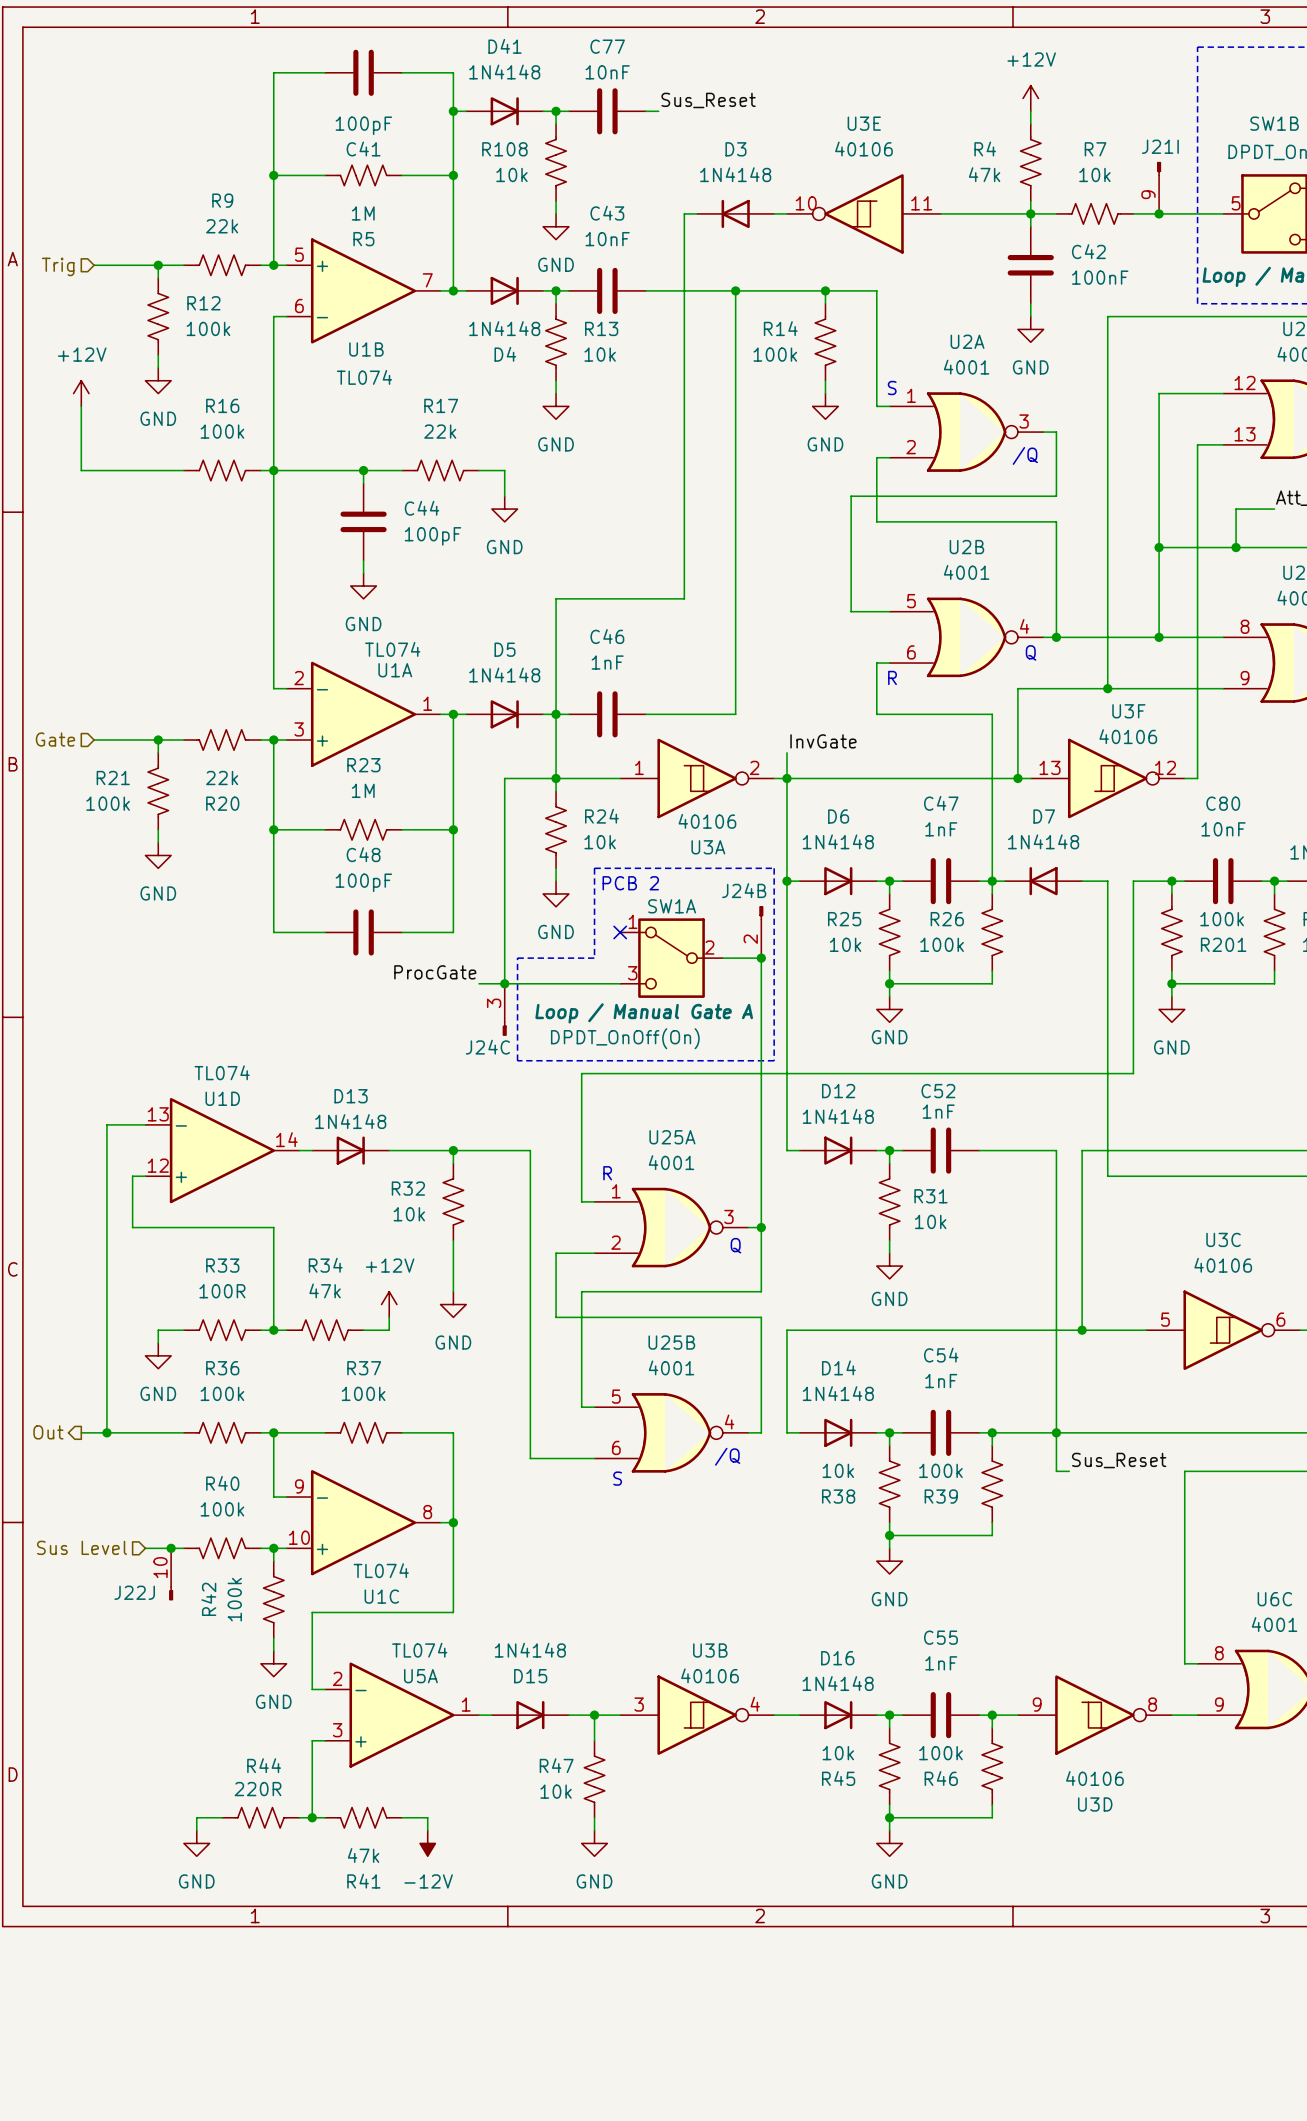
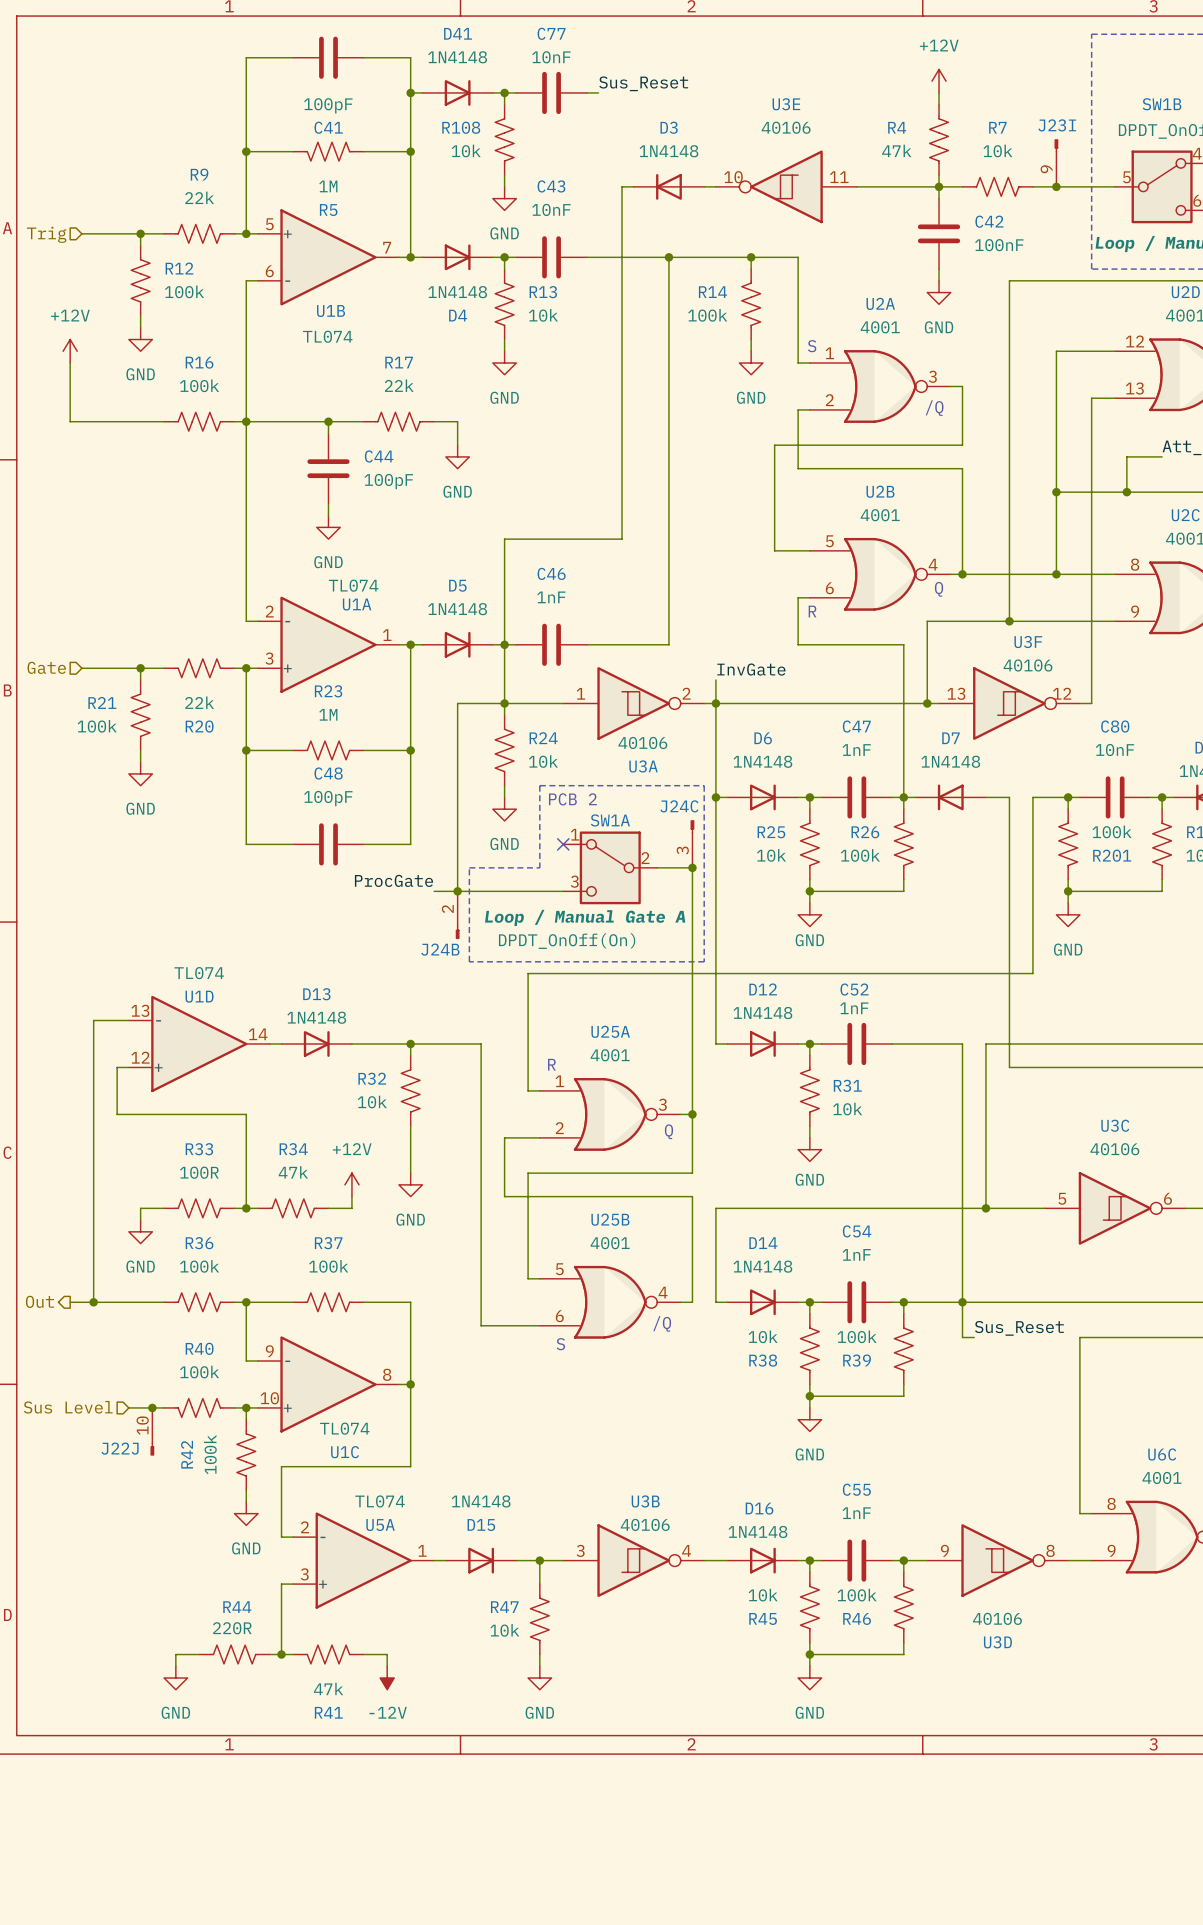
J21I name: J21I (1160, 146) -> J23I (1057, 125)
J24B name position: J24B (744, 890) -> J24B (440, 949)
J24B rotation: 0° (761, 913) -> 180° (457, 932)
J24B position: (761, 932) -> (457, 915)
J24C position: (504, 1009) -> (692, 844)
J24C rotation: 0° (504, 1028) -> 180° (692, 826)
J24C name position: J24C (487, 1047) -> J24C (679, 806)

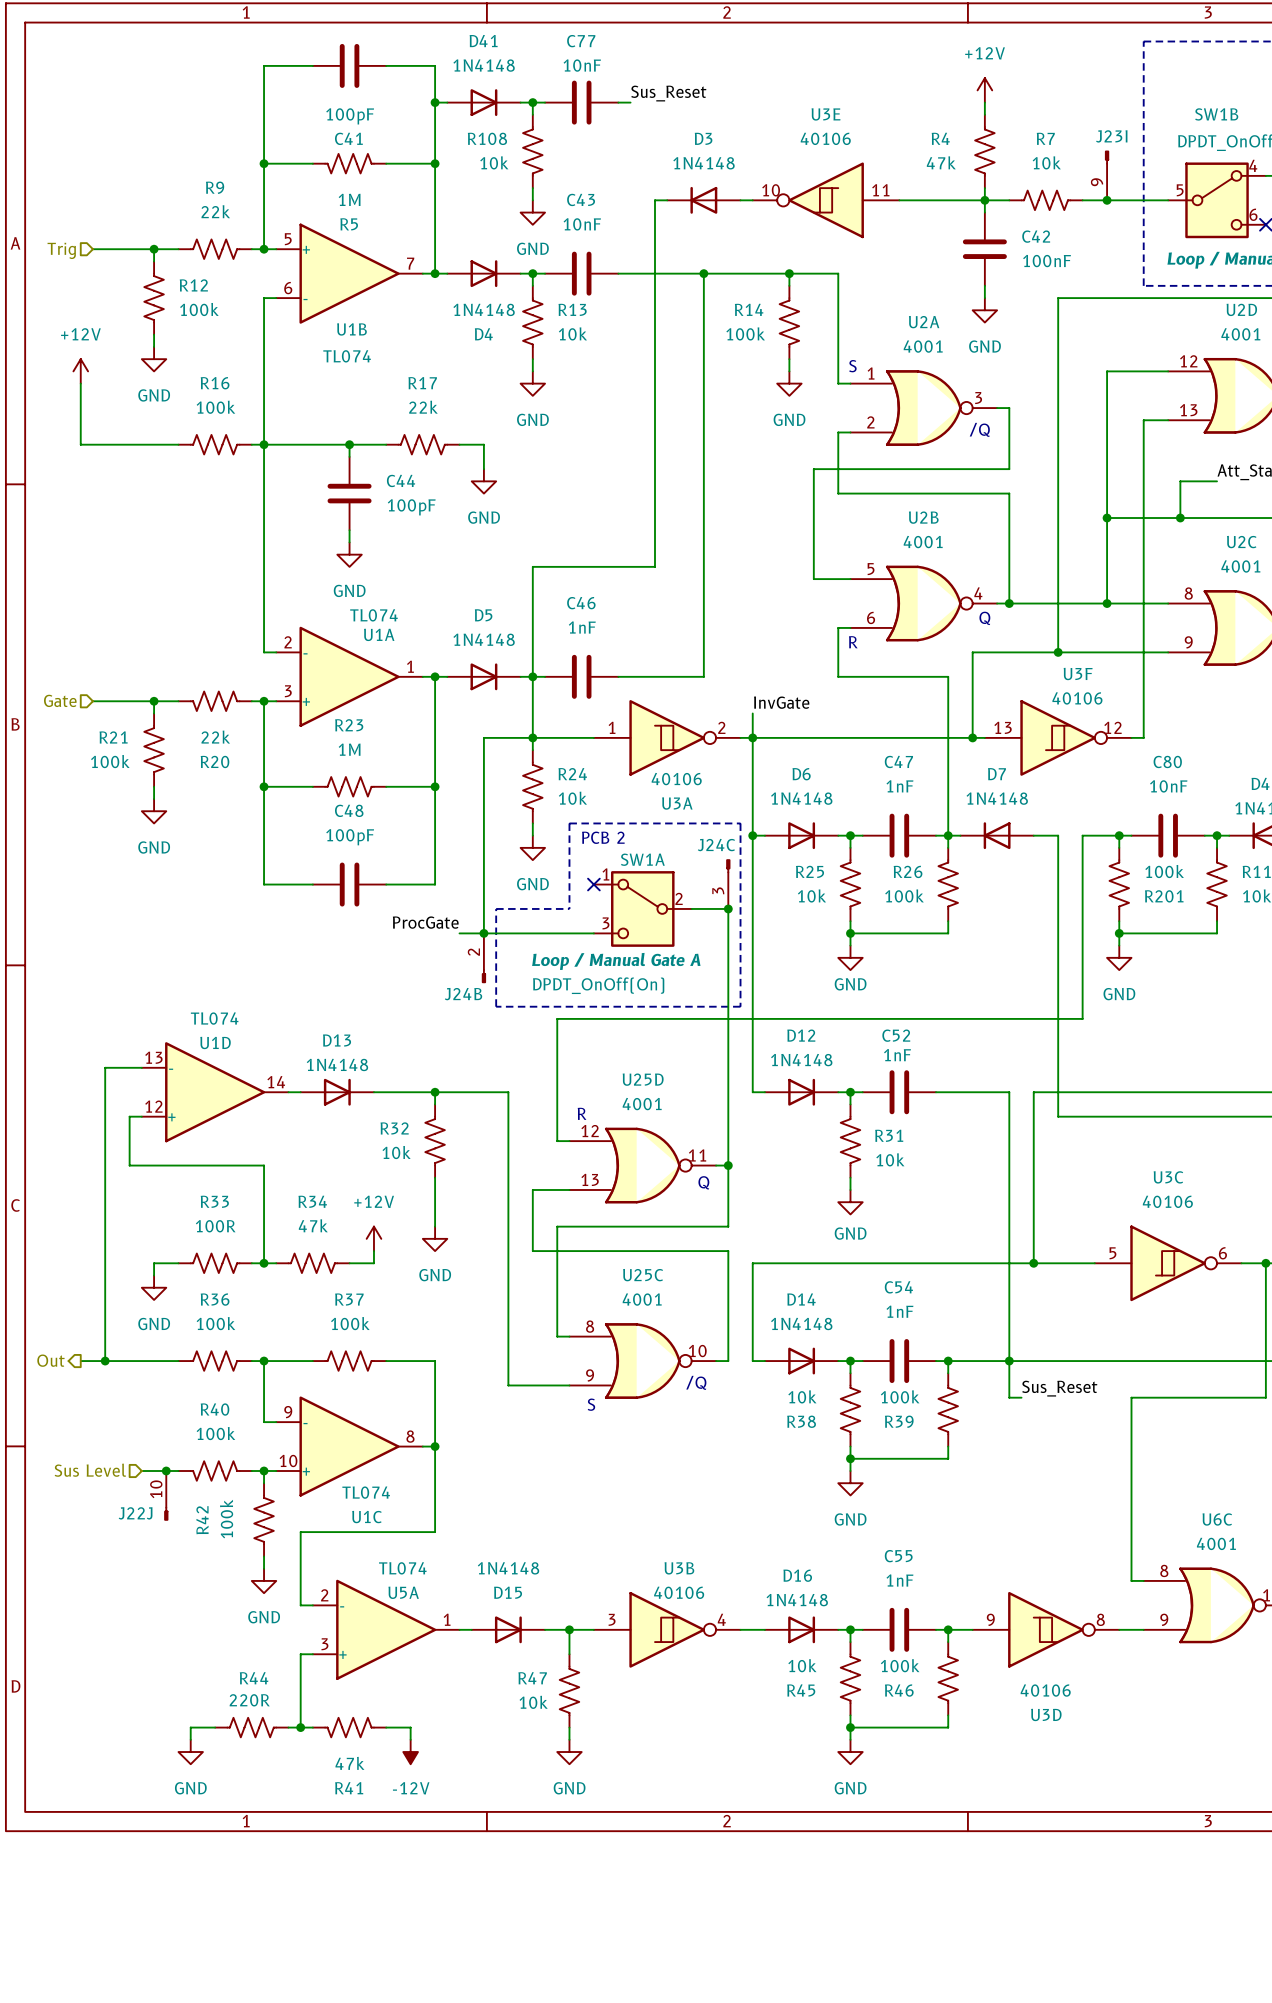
U25A name: U25A (610, 1031) -> U25D (643, 1079)
U25A pin number: 1 (559, 1081) -> 12 (590, 1131)
U25A pin number: 3 (662, 1104) -> 11 (697, 1155)
U25A pin number: 2 (559, 1128) -> 13 (590, 1179)
U25B name: U25B (610, 1219) -> U25C (643, 1275)
U25B pin number: 5 (559, 1269) -> 8 (590, 1326)
U25B pin number: 4 (663, 1292) -> 10 (697, 1351)
U25B pin number: 6 (559, 1316) -> 9 (590, 1375)

